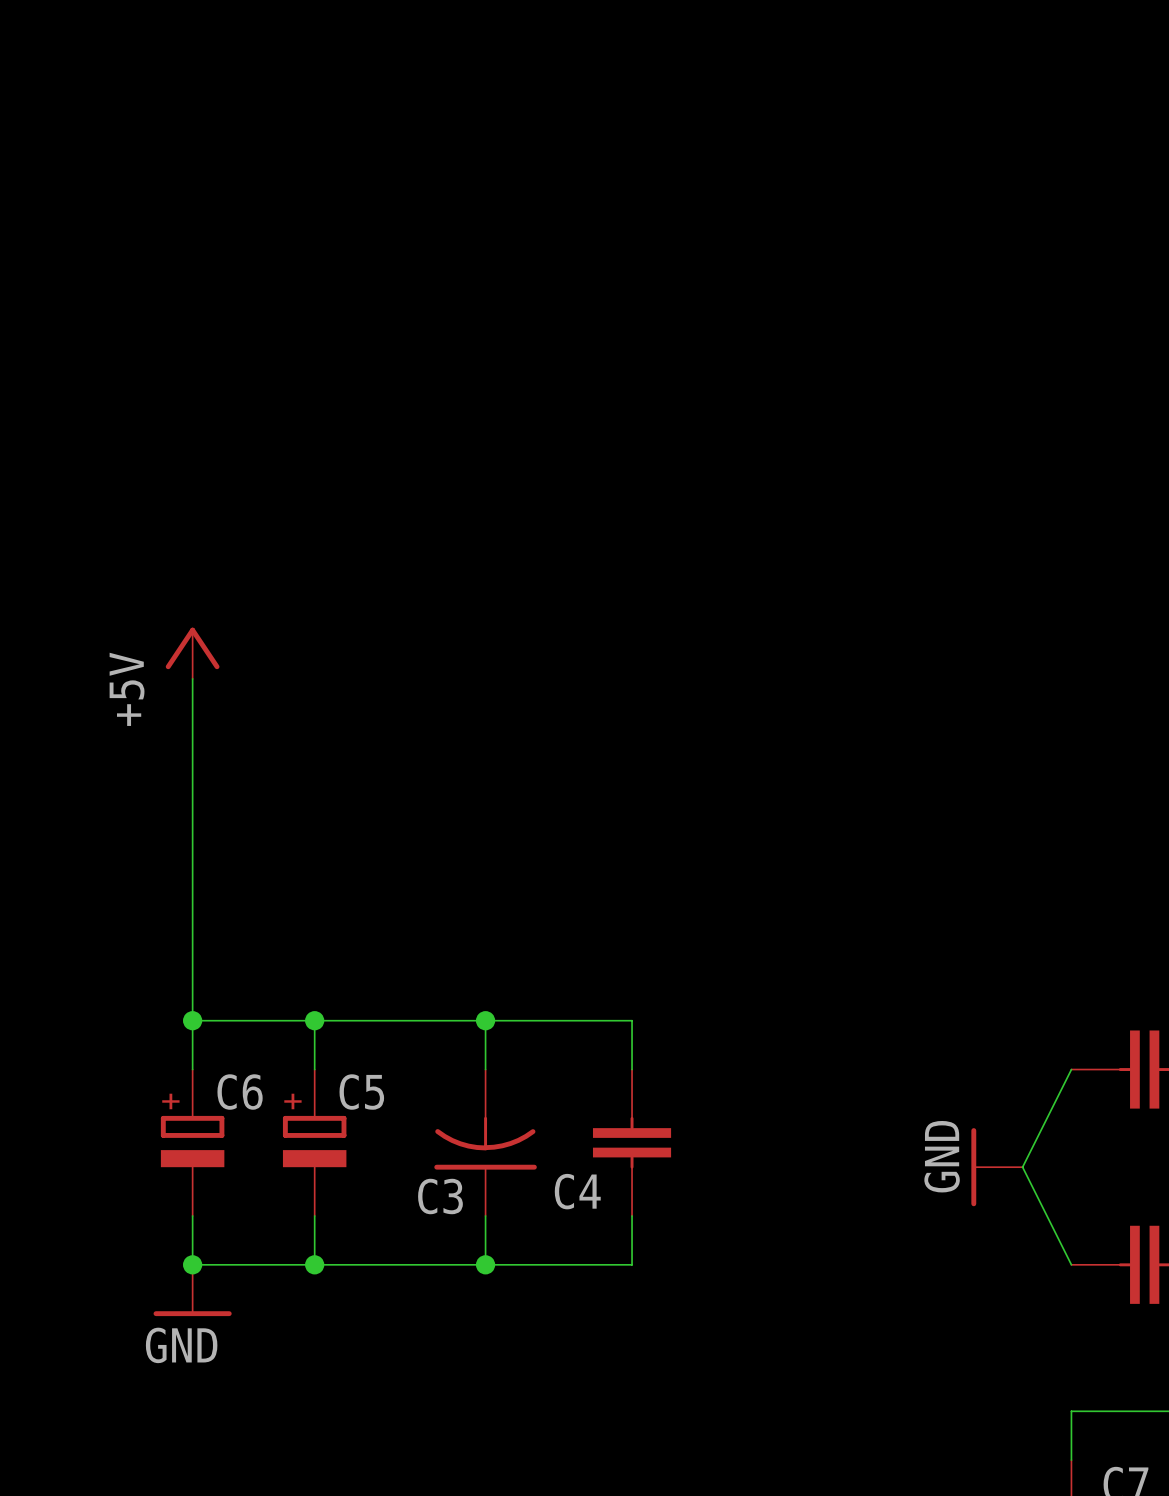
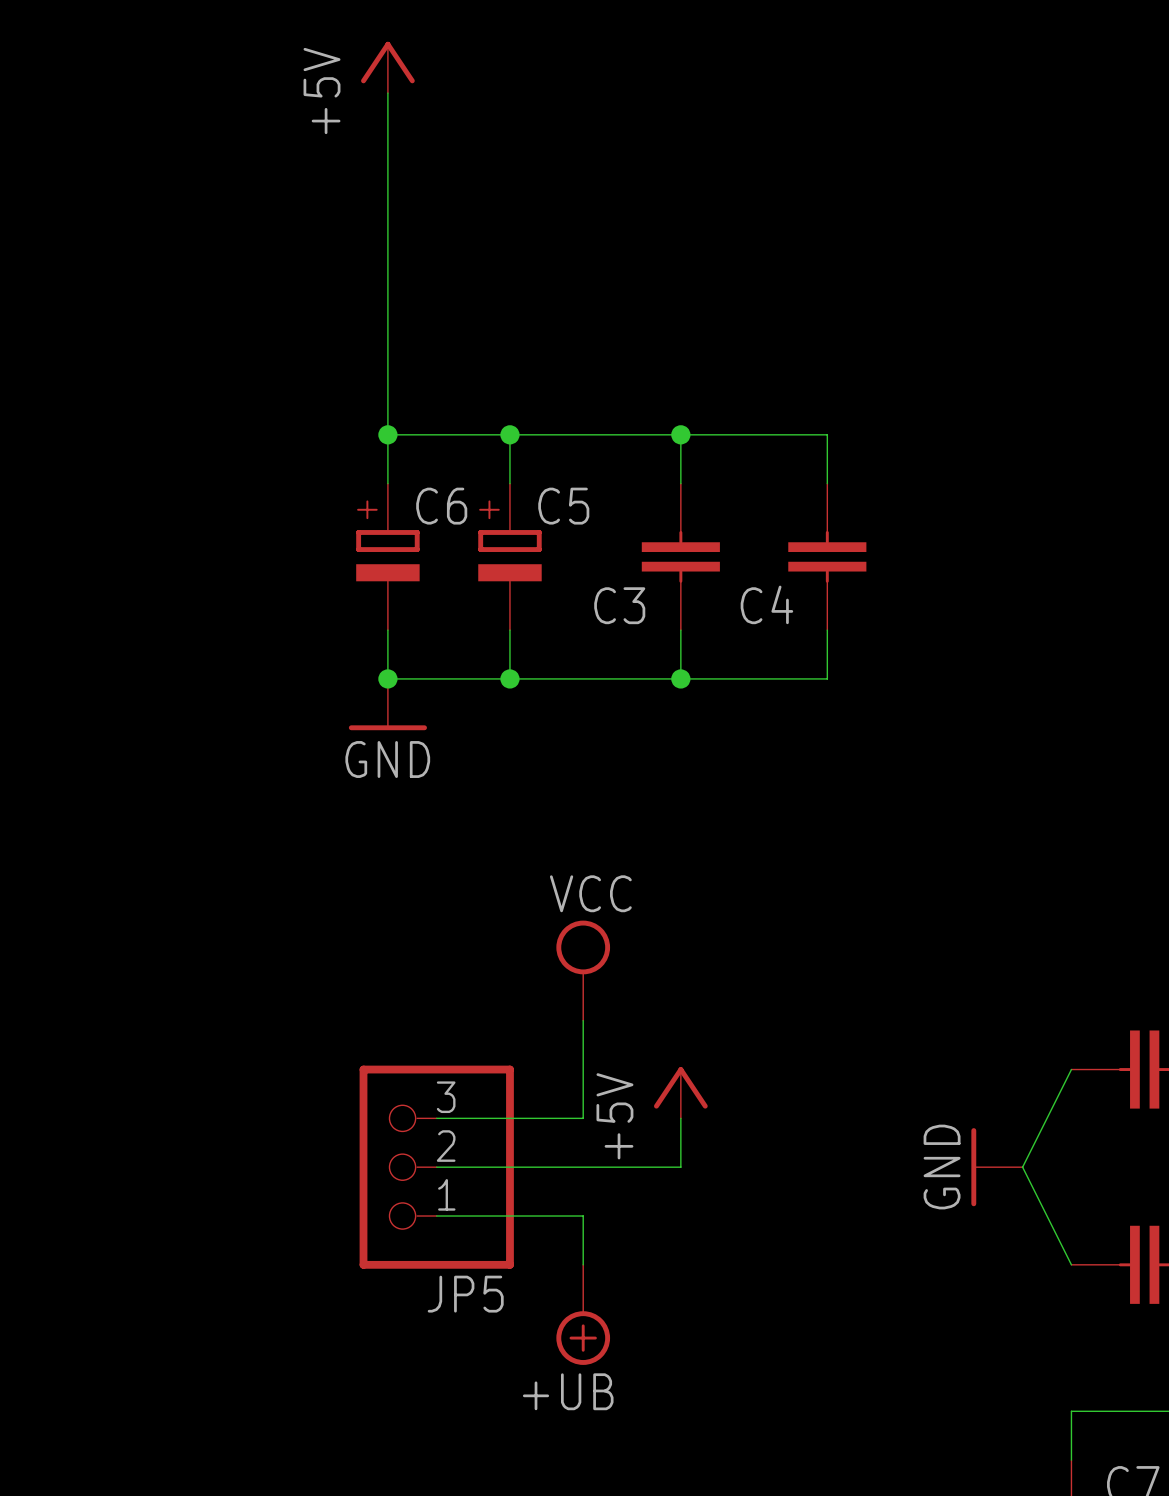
power symbol: none -> +5V (387, 67)
wire: none -> (387, 93) (387, 483)
wire: none -> (387, 434) (827, 434) (827, 483)
junction: none -> (387, 434)
wire: none -> (509, 434) (509, 483)
junction: none -> (509, 434)
wire: none -> (680, 434) (680, 483)
junction: none -> (680, 434)
wire: none -> (387, 630) (387, 678) (827, 678) (827, 630)
power symbol: +5V (192, 653) -> none
wire: (192, 678) (192, 1069) -> none
junction: none -> (387, 678)
junction: none -> (509, 678)
junction: none -> (680, 678)
power symbol: none -> GND (387, 704)
power symbol: none -> VCC (583, 970)
wire: (192, 1020) (632, 1020) (632, 1069) -> none
junction: (192, 1020) -> none
wire: (314, 1020) (314, 1069) -> (509, 630) (509, 678)
junction: (314, 1020) -> none
wire: (485, 1020) (485, 1069) -> (680, 630) (680, 678)
junction: (485, 1020) -> none
wire: none -> (583, 1020) (583, 1118) (436, 1118)
C3 symbol: [434, 1069, 537, 1217] -> [641, 483, 720, 631]
power symbol: none -> +5V (680, 1092)
wire: none -> (680, 1118) (680, 1167) (436, 1167)
C6 position: (192, 1142) -> (387, 556)
C5 position: (314, 1142) -> (509, 556)
C4 position: (632, 1142) -> (827, 556)
JP5: none -> (436, 1167)
wire: (192, 1216) (192, 1264) (632, 1264) (632, 1216) -> none
wire: (314, 1216) (314, 1264) -> none
wire: none -> (436, 1216) (583, 1216) (583, 1264)
wire: (485, 1216) (485, 1264) -> none
junction: (192, 1264) -> none
junction: (314, 1264) -> none
junction: (485, 1264) -> none
power symbol: GND (192, 1290) -> none
power symbol: none -> +UB (583, 1314)

